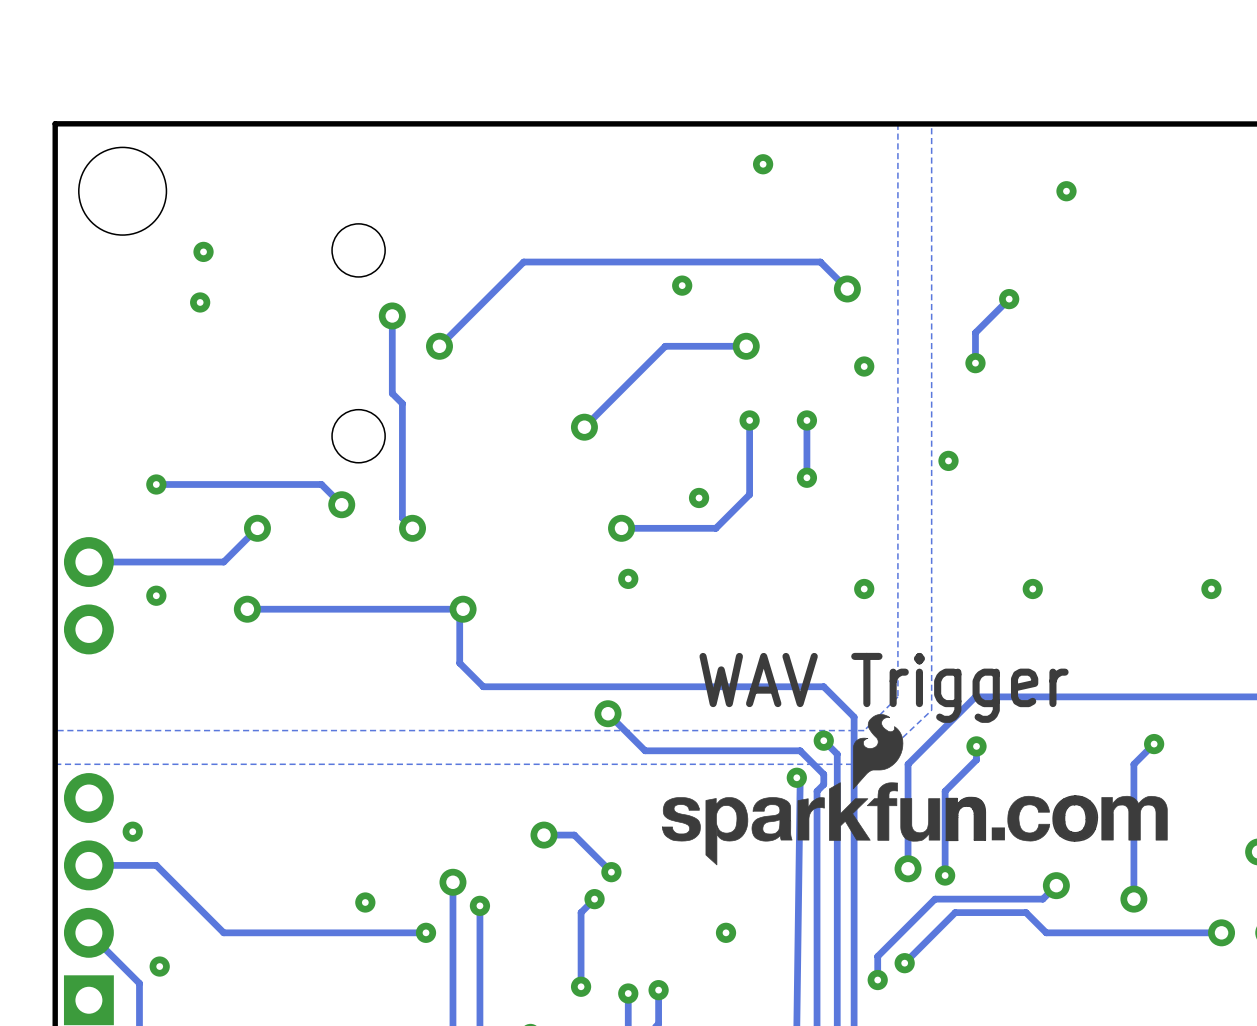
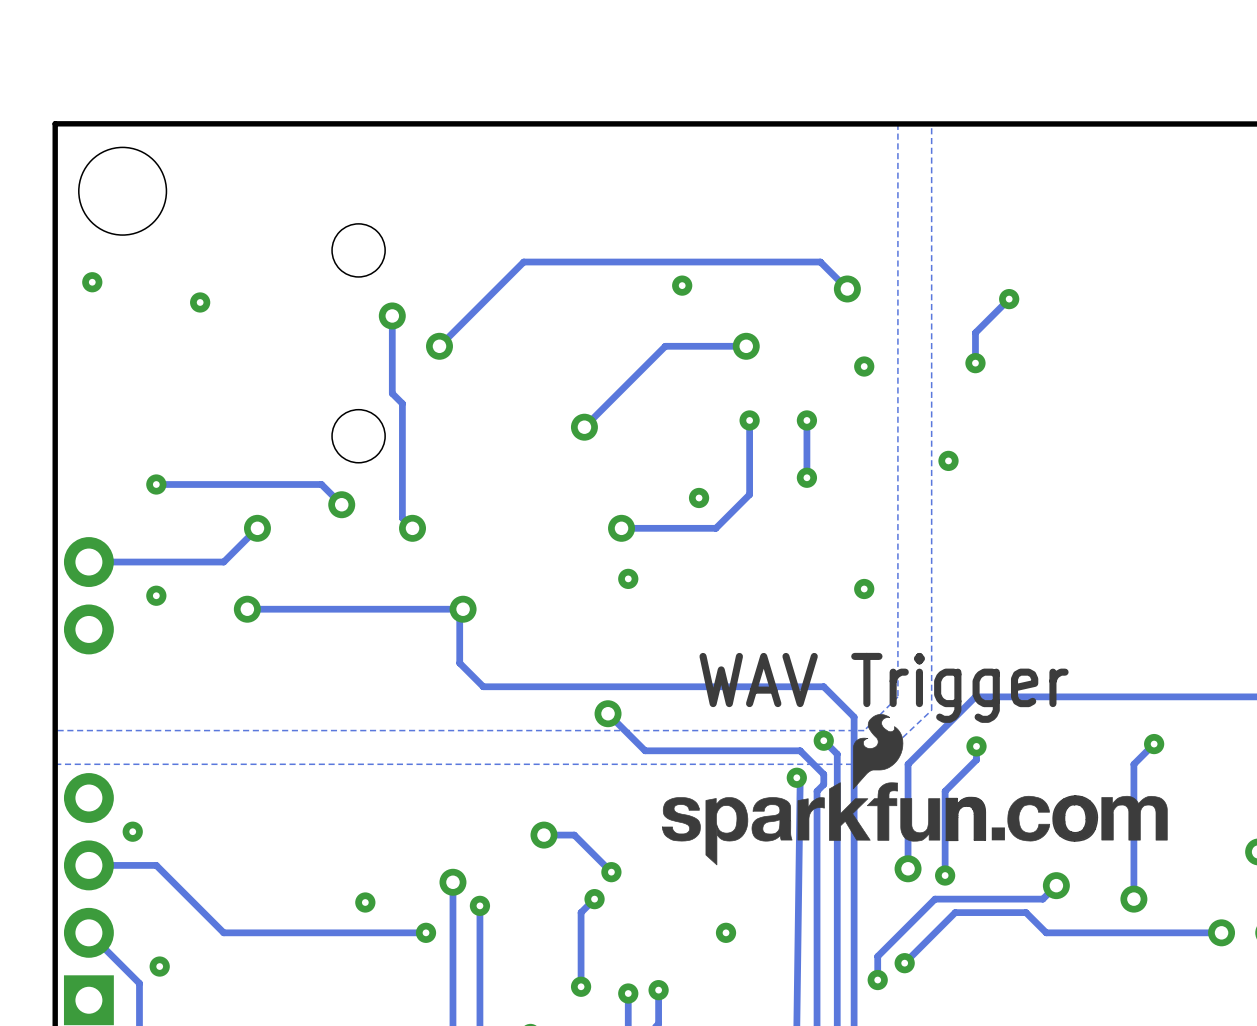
via: (763, 164) -> none
via: (1066, 191) -> none
via position: (203, 251) -> (92, 282)
via: (1032, 589) -> none
via: (1211, 589) -> none

